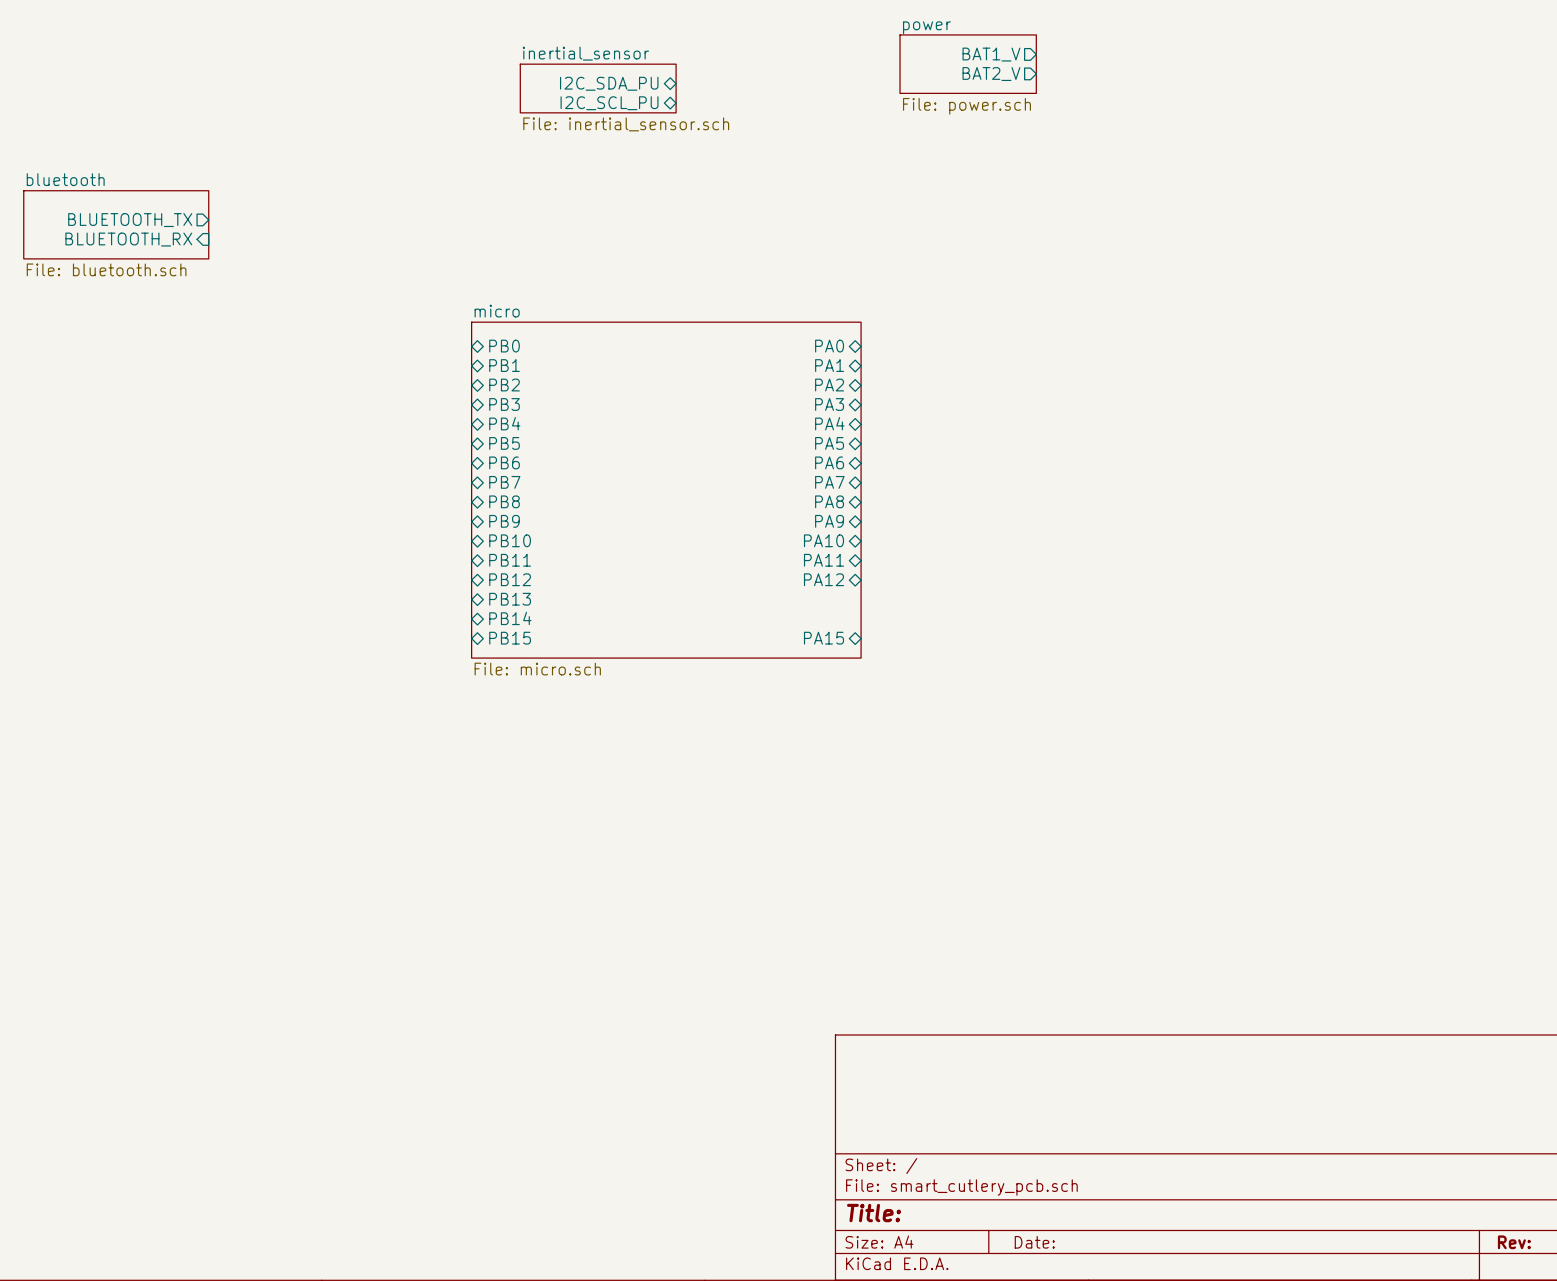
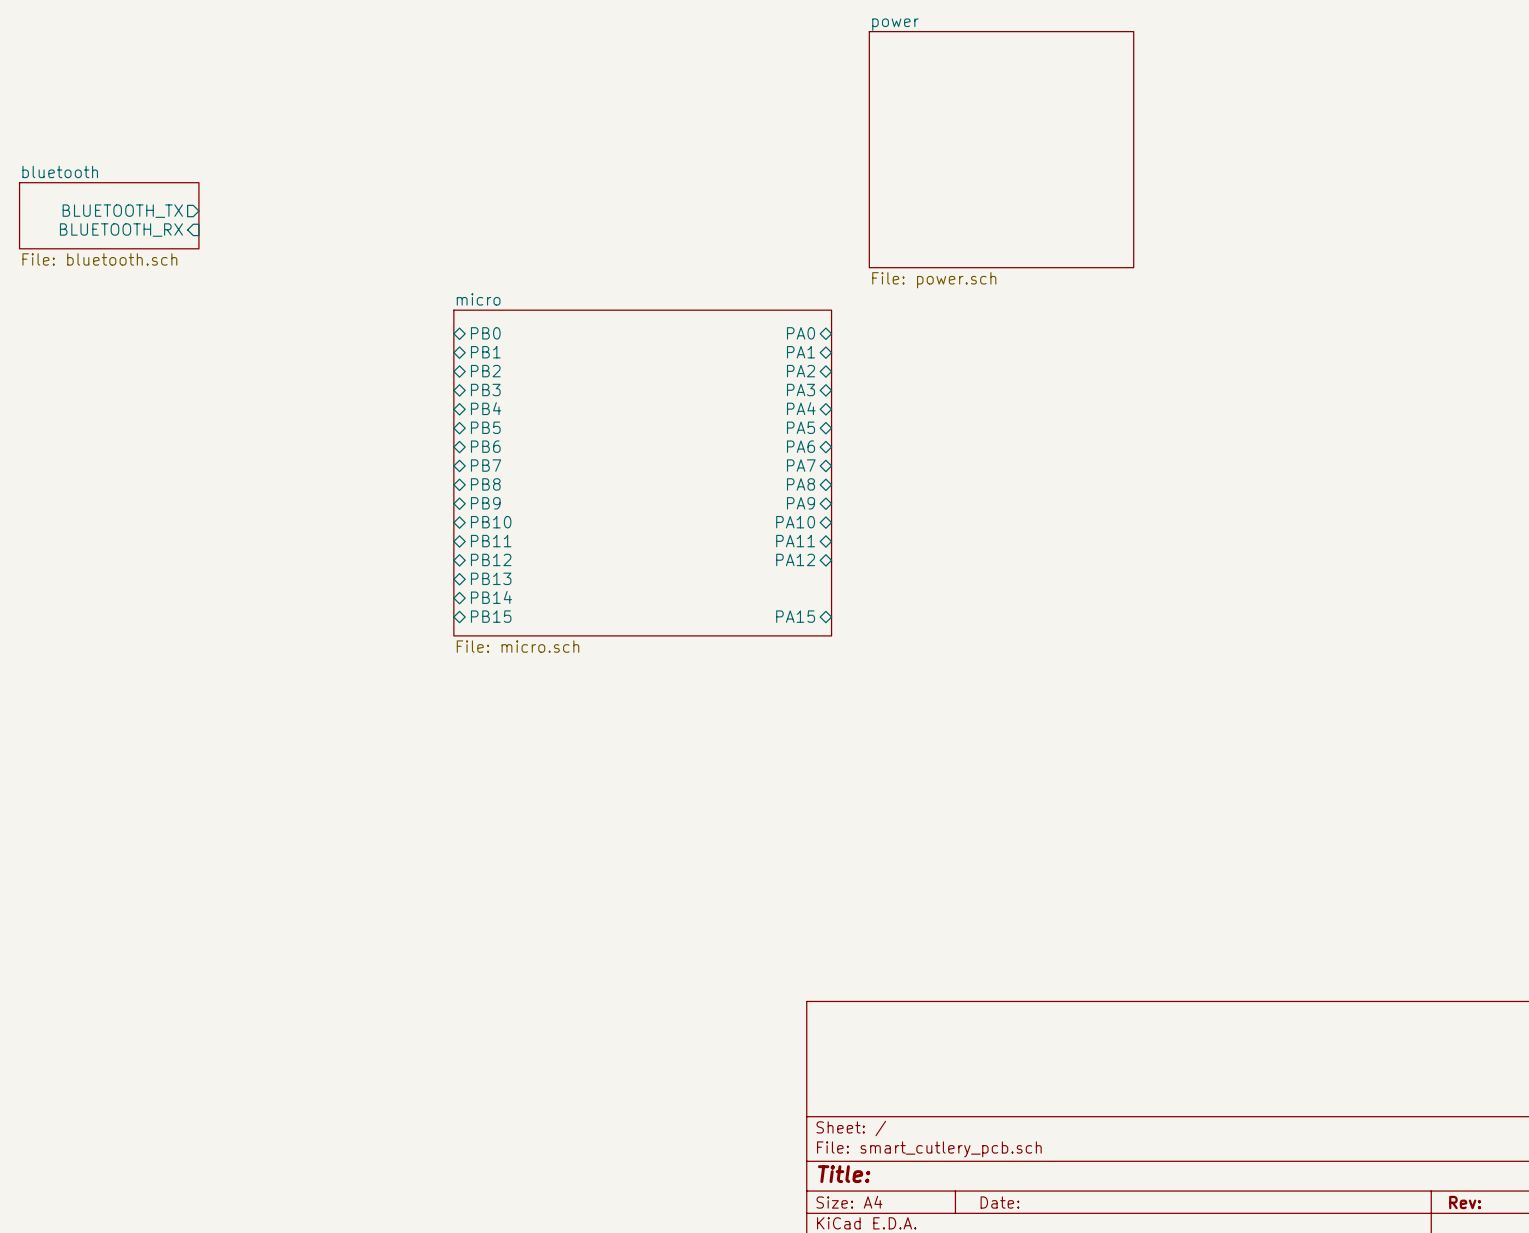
sheet pin: BAT1_V (991, 54) -> none
sheet power: File: power.sch (968, 64) -> none
sheet pin: BAT2_V (991, 74) -> none
sheet pin: I2C_SDA_PU (609, 83) -> none
sheet inertial_sensor: File: inertial_sensor.sch (598, 88) -> none
sheet pin: I2C_SCL_PU (609, 103) -> none
sheet power: none -> File: power.sch (1001, 149)

